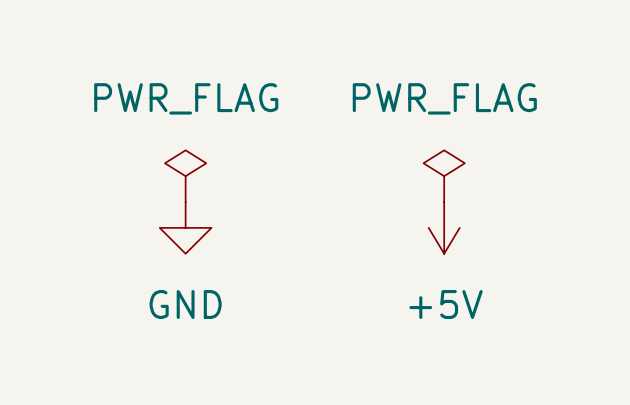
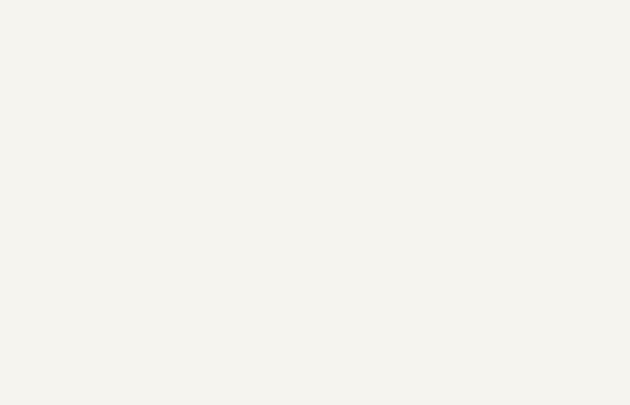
power symbol: PWR_FLAG (185, 176) -> none
power symbol: PWR_FLAG (444, 176) -> none
power symbol: GND (185, 227) -> none
power symbol: +5V (444, 227) -> none

